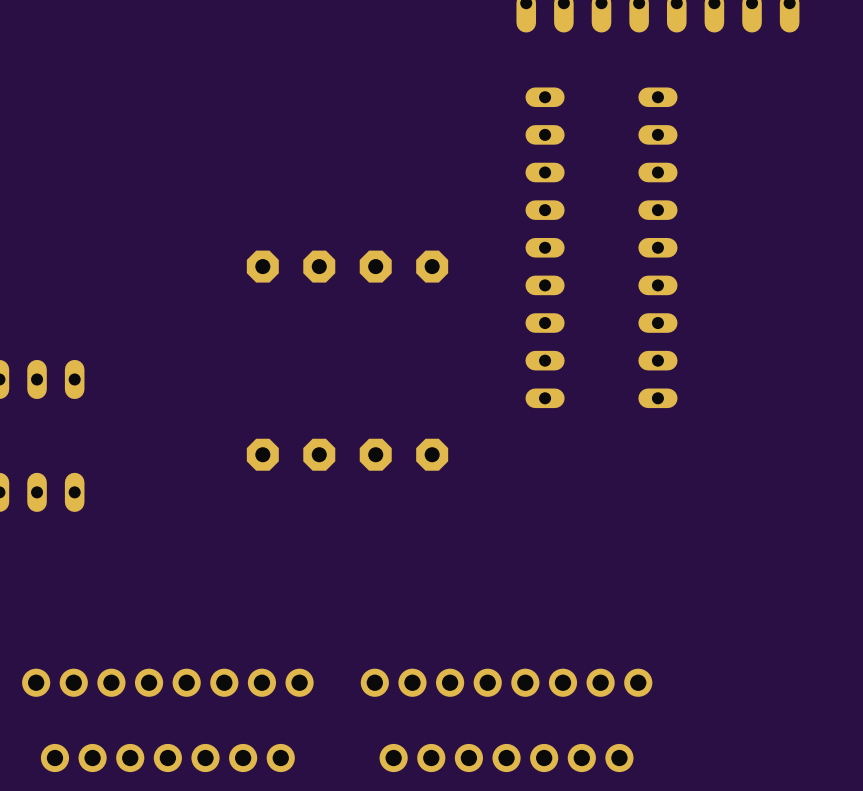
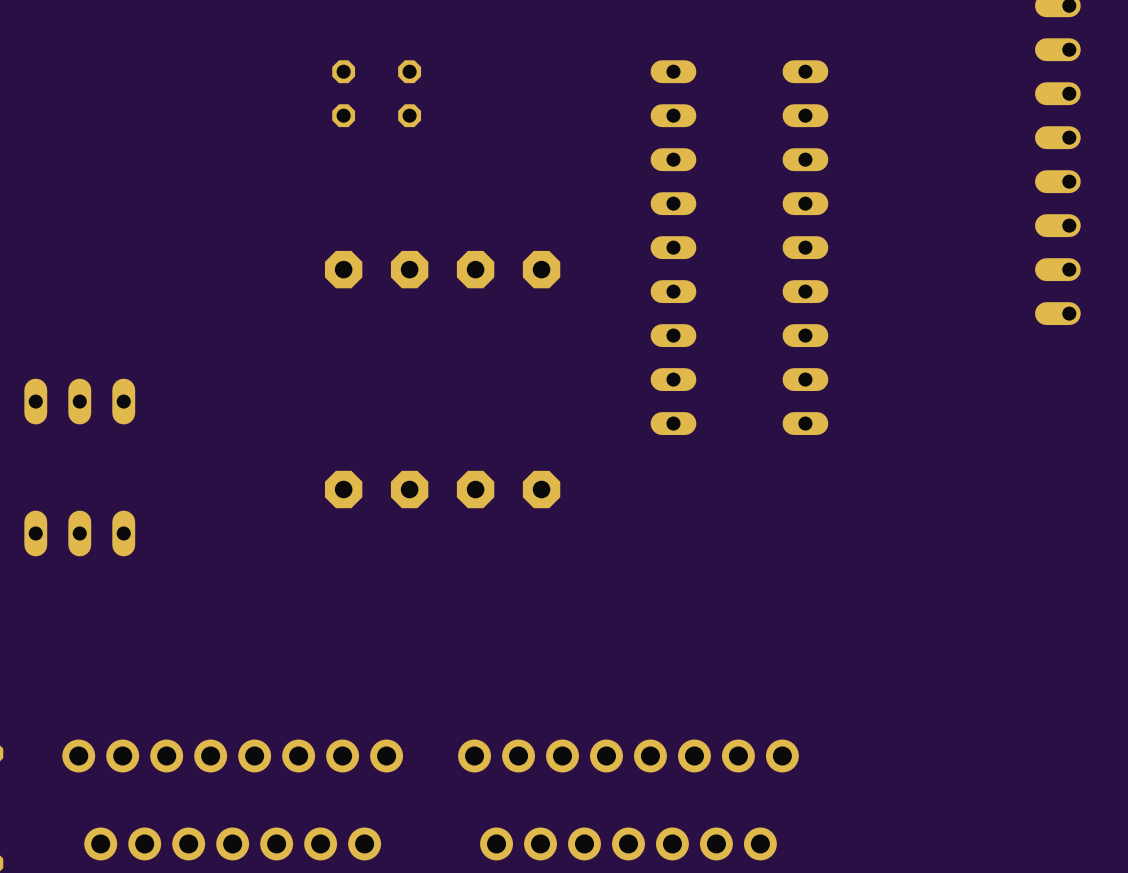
part: none -> (343, 93)
part: none -> (409, 93)

